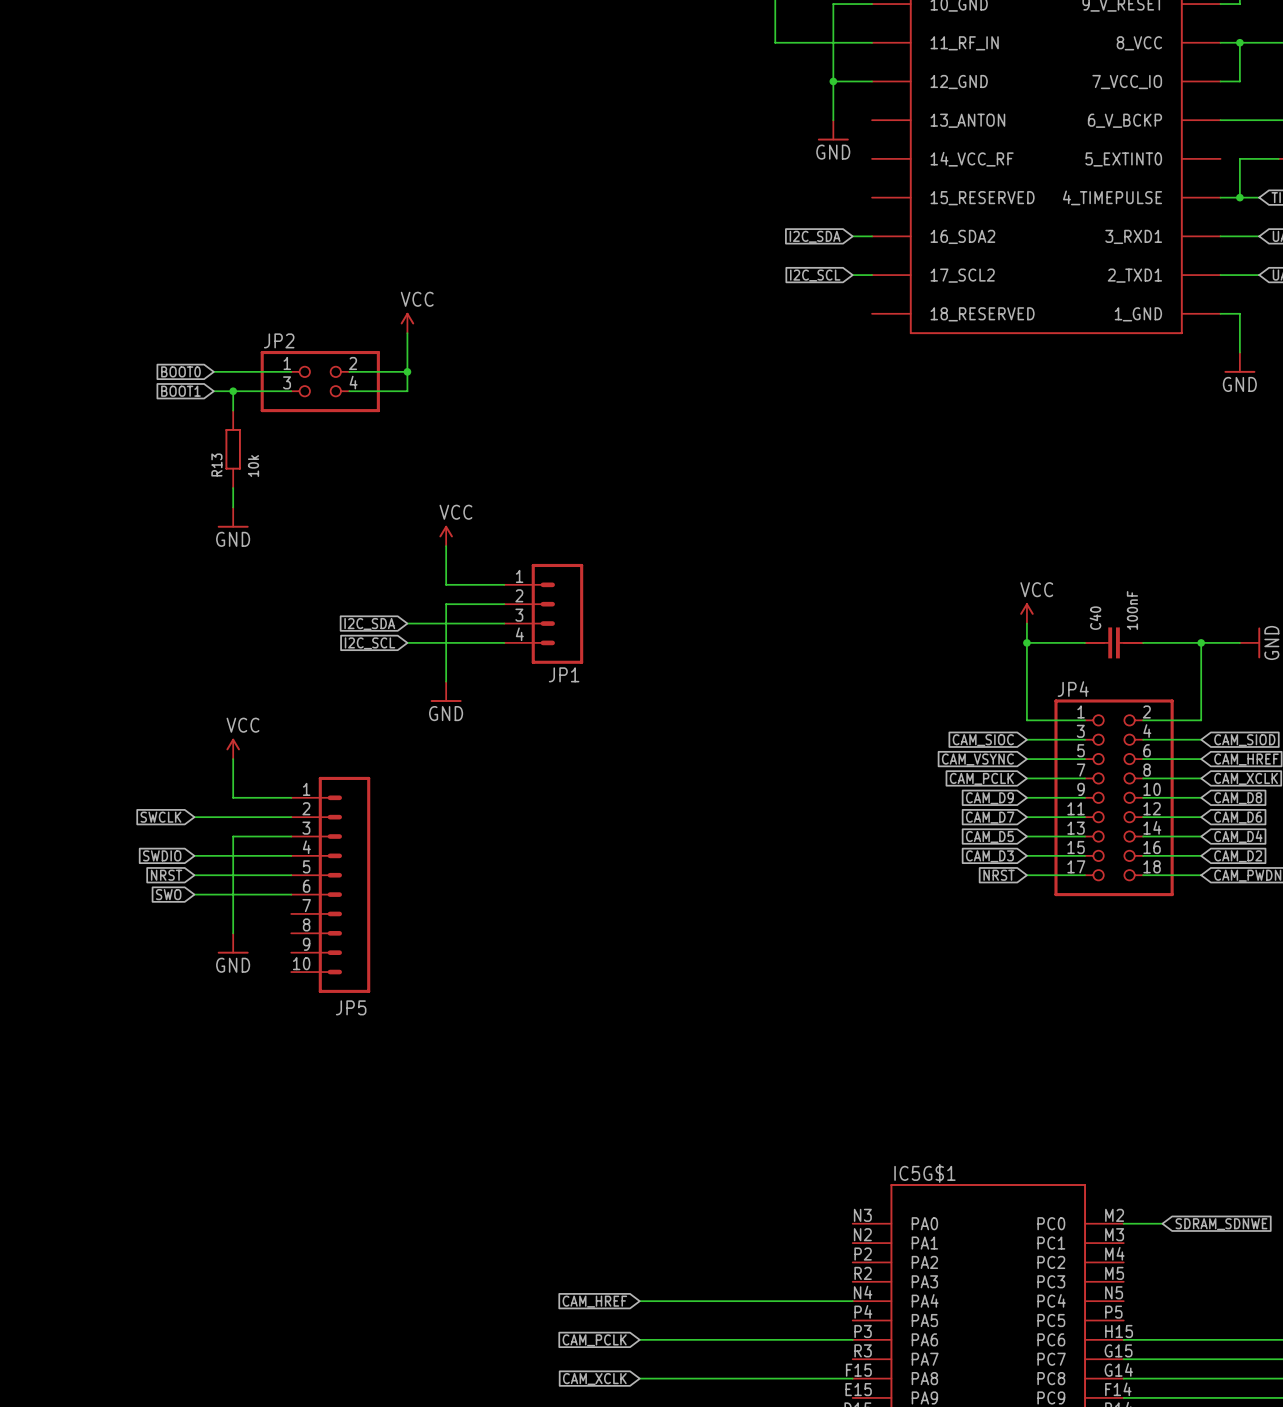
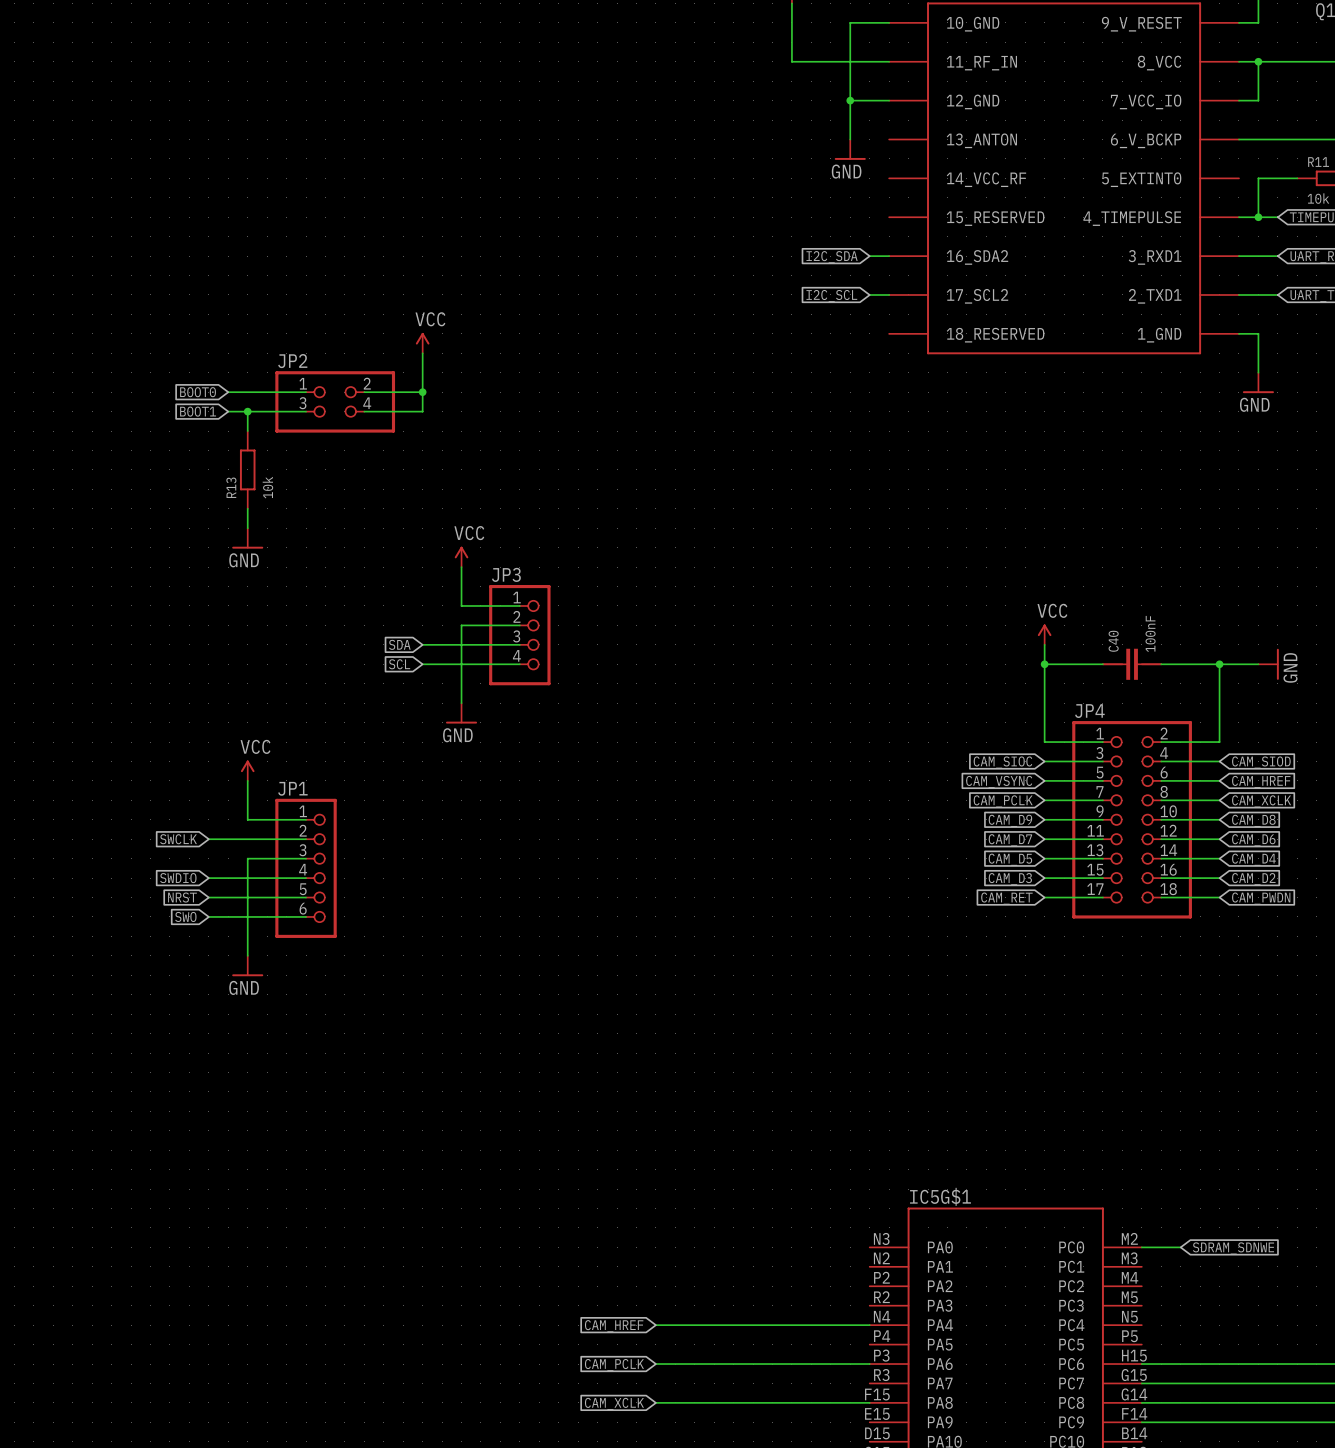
JP1 symbol: [504, 563, 584, 664] -> [275, 798, 337, 938]
JP3: none -> (519, 635)
global label: I2C_SDA (369, 624) -> SDA (399, 644)
global label: I2C_SCL (369, 643) -> SCL (399, 664)
JP1 name position: JP1 (564, 674) -> JP1 (292, 788)
global label: NRST (999, 875) -> CAM_RET (1006, 898)
JP5: (330, 884) -> none

